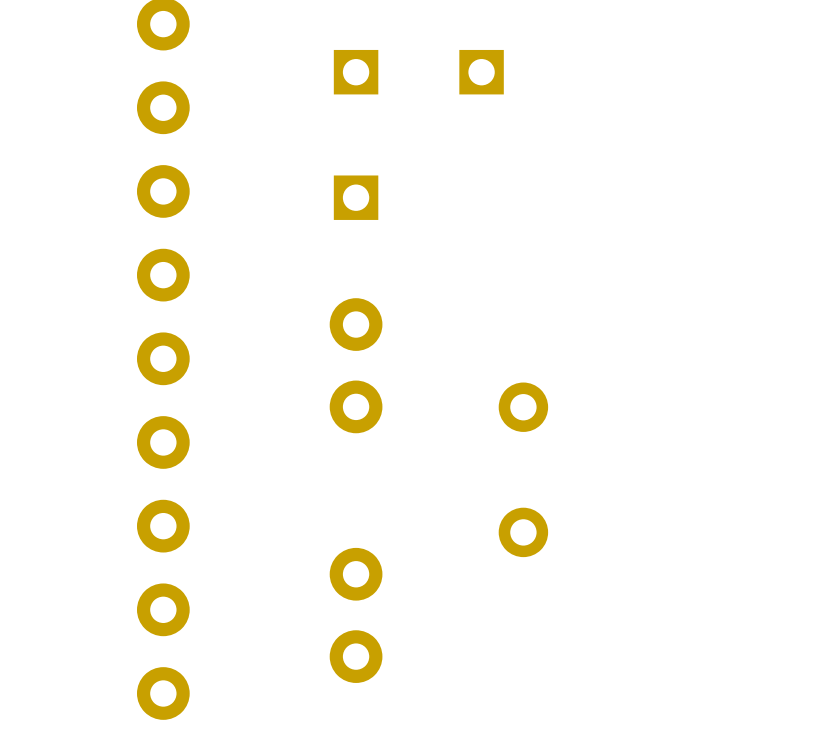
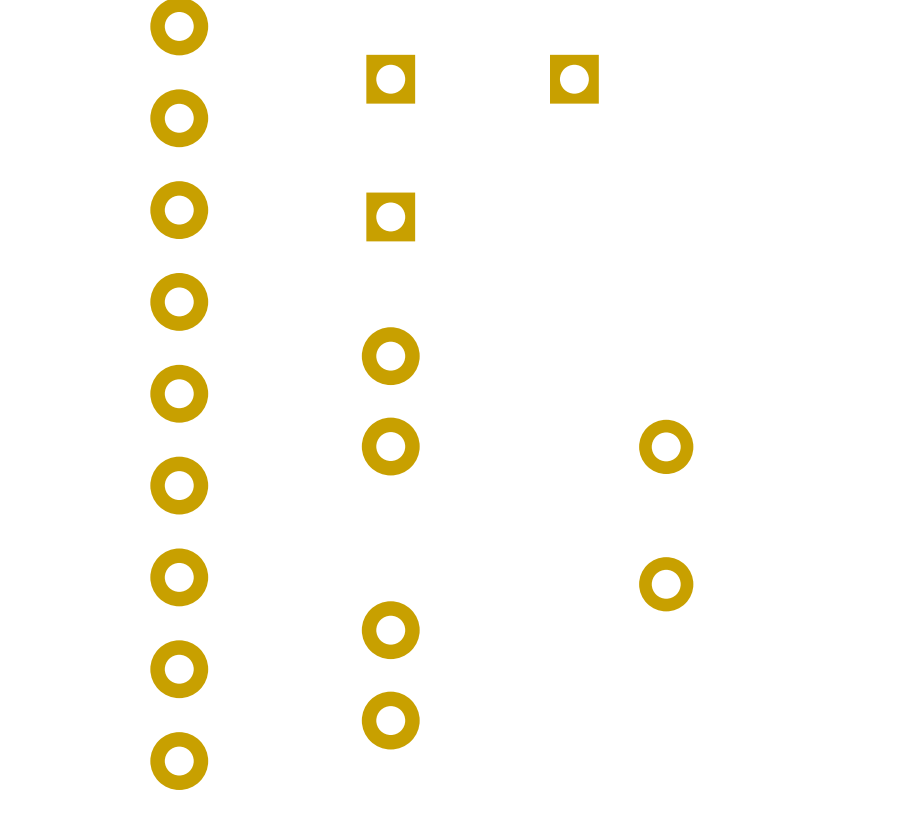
part position: (481, 72) -> (574, 79)
part position: (523, 469) -> (666, 515)

